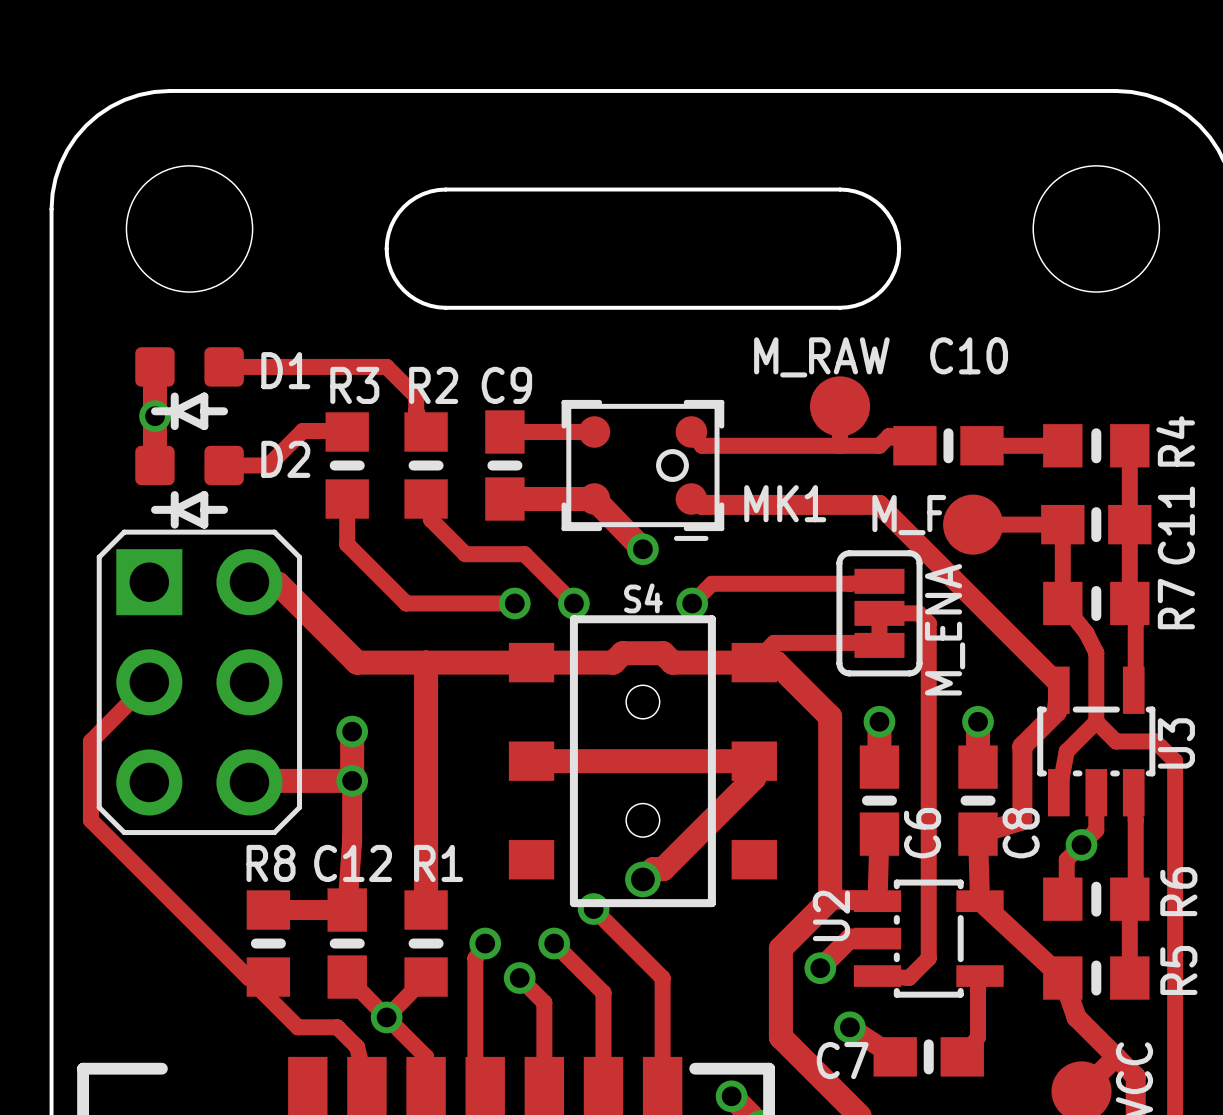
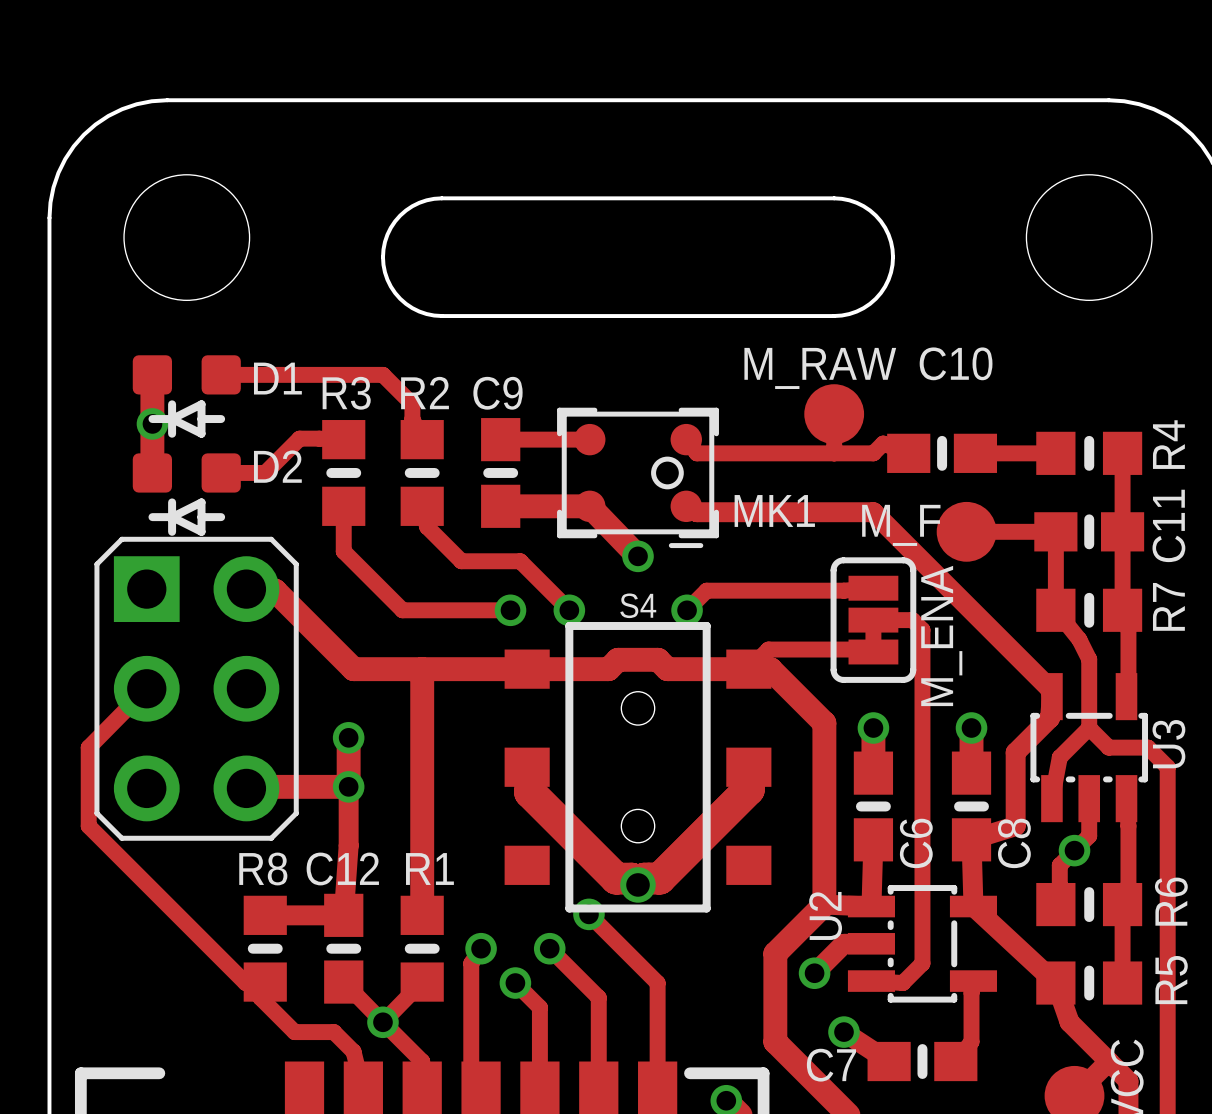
track: (534, 761) (754, 761) -> (530, 767) (530, 792) (616, 878) (631, 878) (638, 884) (644, 878) (659, 878) (748, 789) (748, 783)

